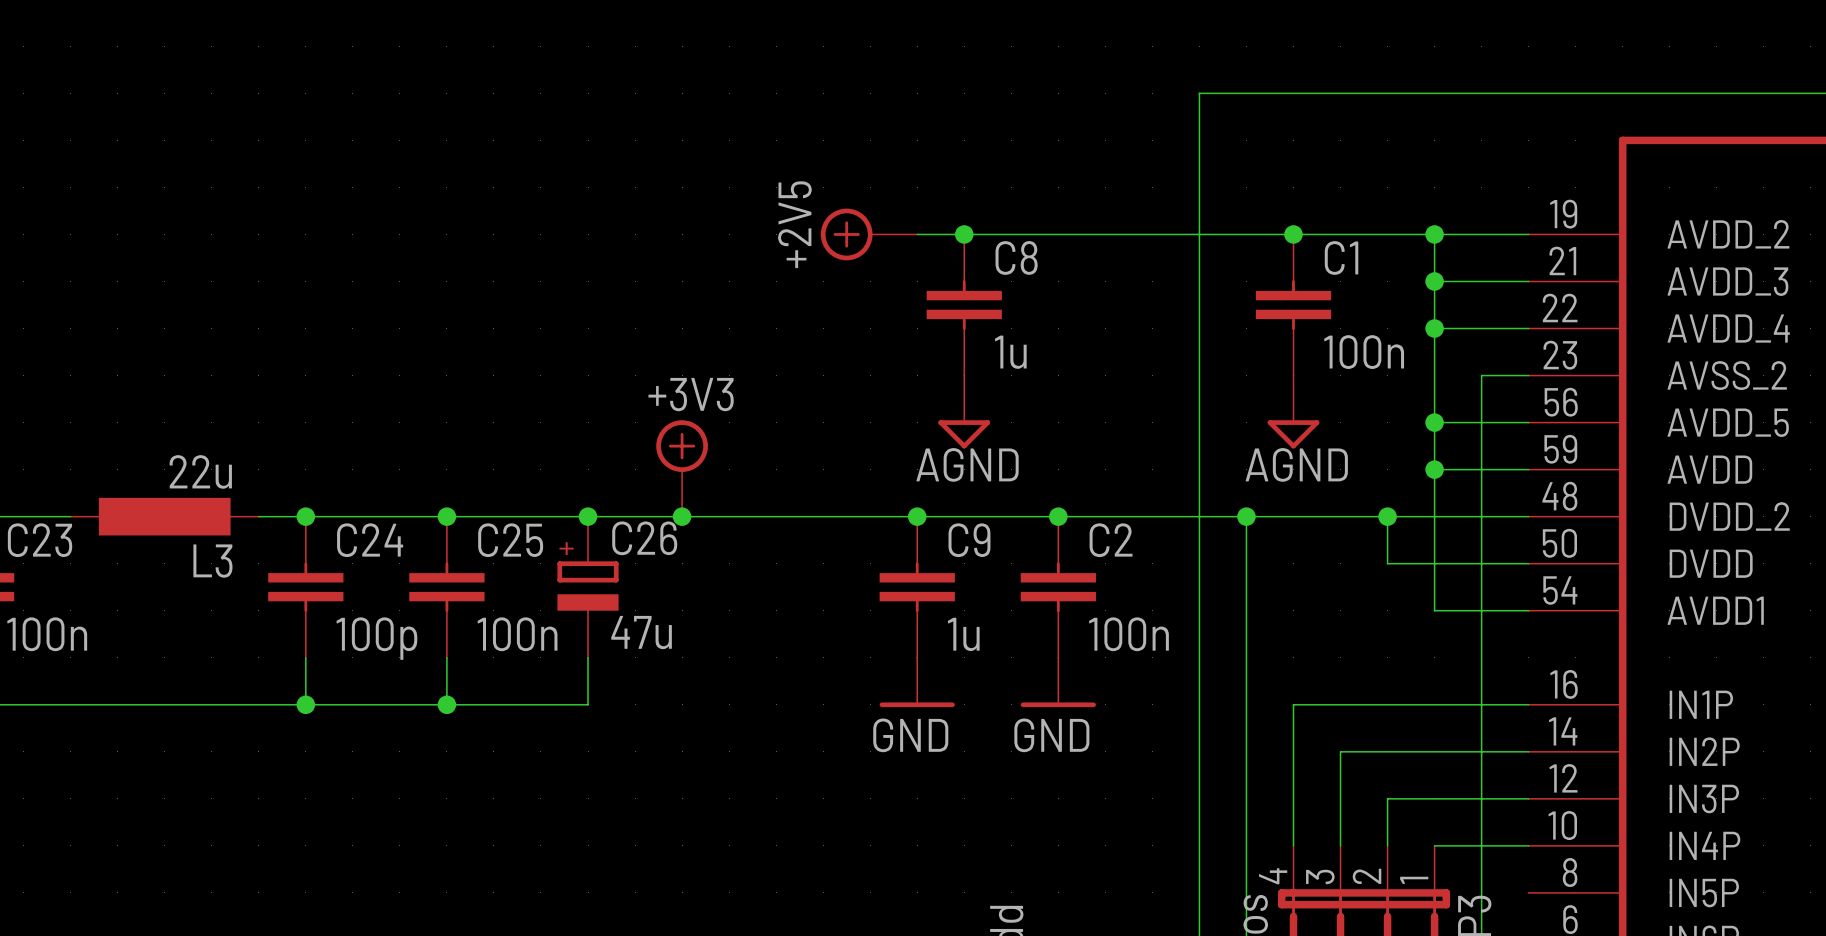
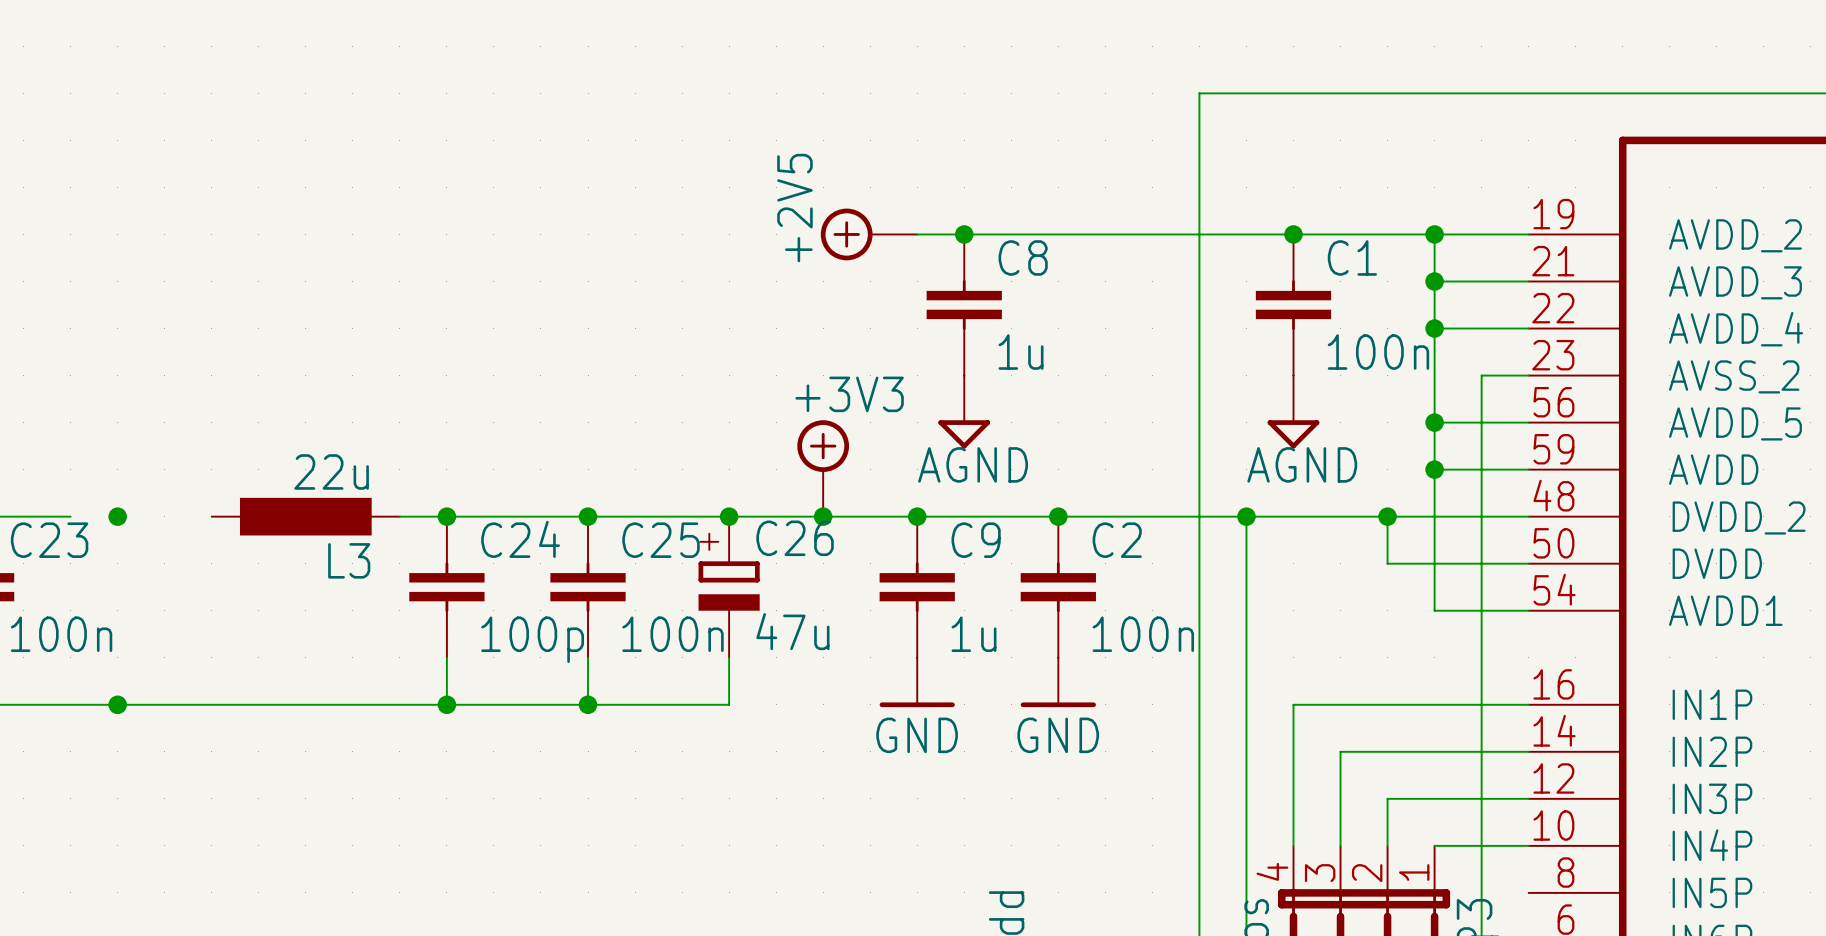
power symbol position: +3V3 (682, 468) -> +3V3 (823, 468)
junction: none -> (117, 516)
L3 position: (164, 516) -> (305, 516)
junction: (305, 516) -> none
junction position: (682, 516) -> (729, 516)
junction: none -> (823, 516)
C25 name: C25 (510, 540) -> C24 (520, 539)
C24: 100p (305, 587) -> none
C26 position: (588, 587) -> (729, 587)
C25: none -> 100n (588, 587)
C25 value: 100n (517, 634) -> 100p (532, 639)
wire: (305, 657) (305, 704) -> none
wire: none -> (729, 657) (729, 704) (588, 704)
junction: none -> (117, 704)
junction: (305, 704) -> none
junction: none -> (588, 704)

